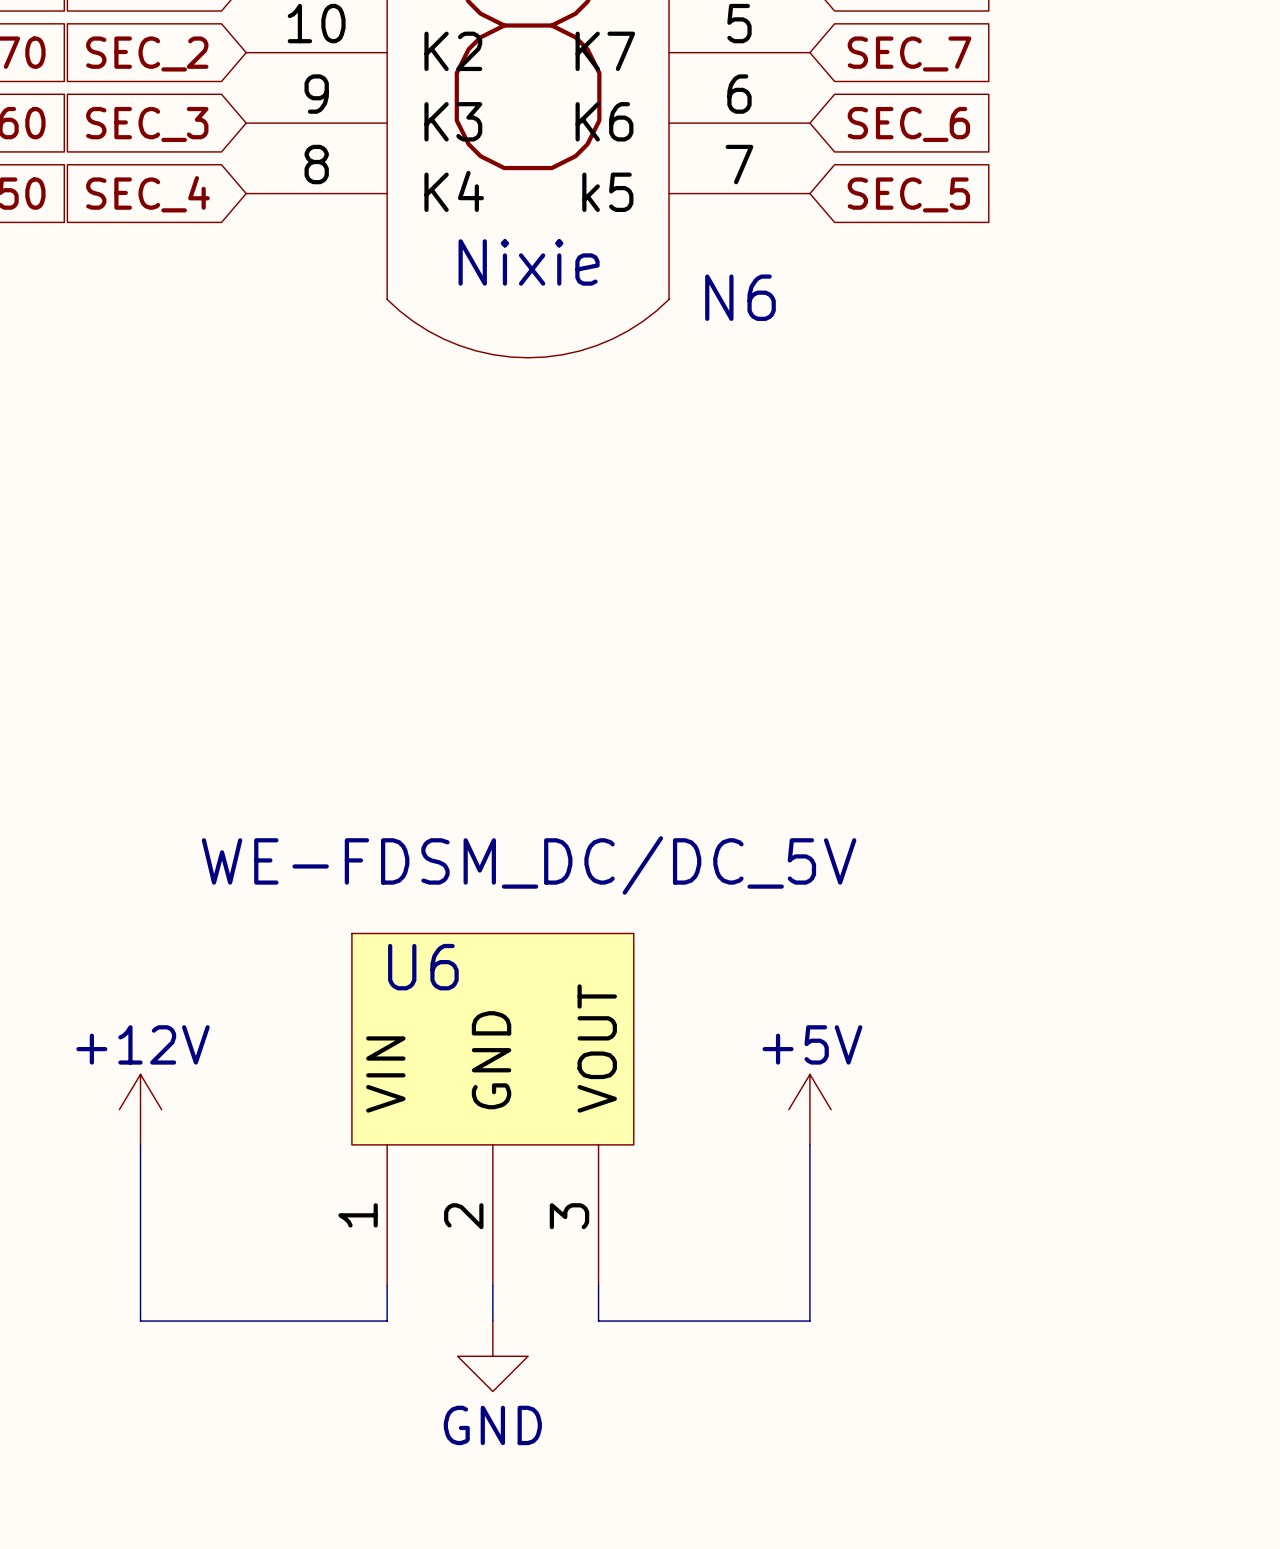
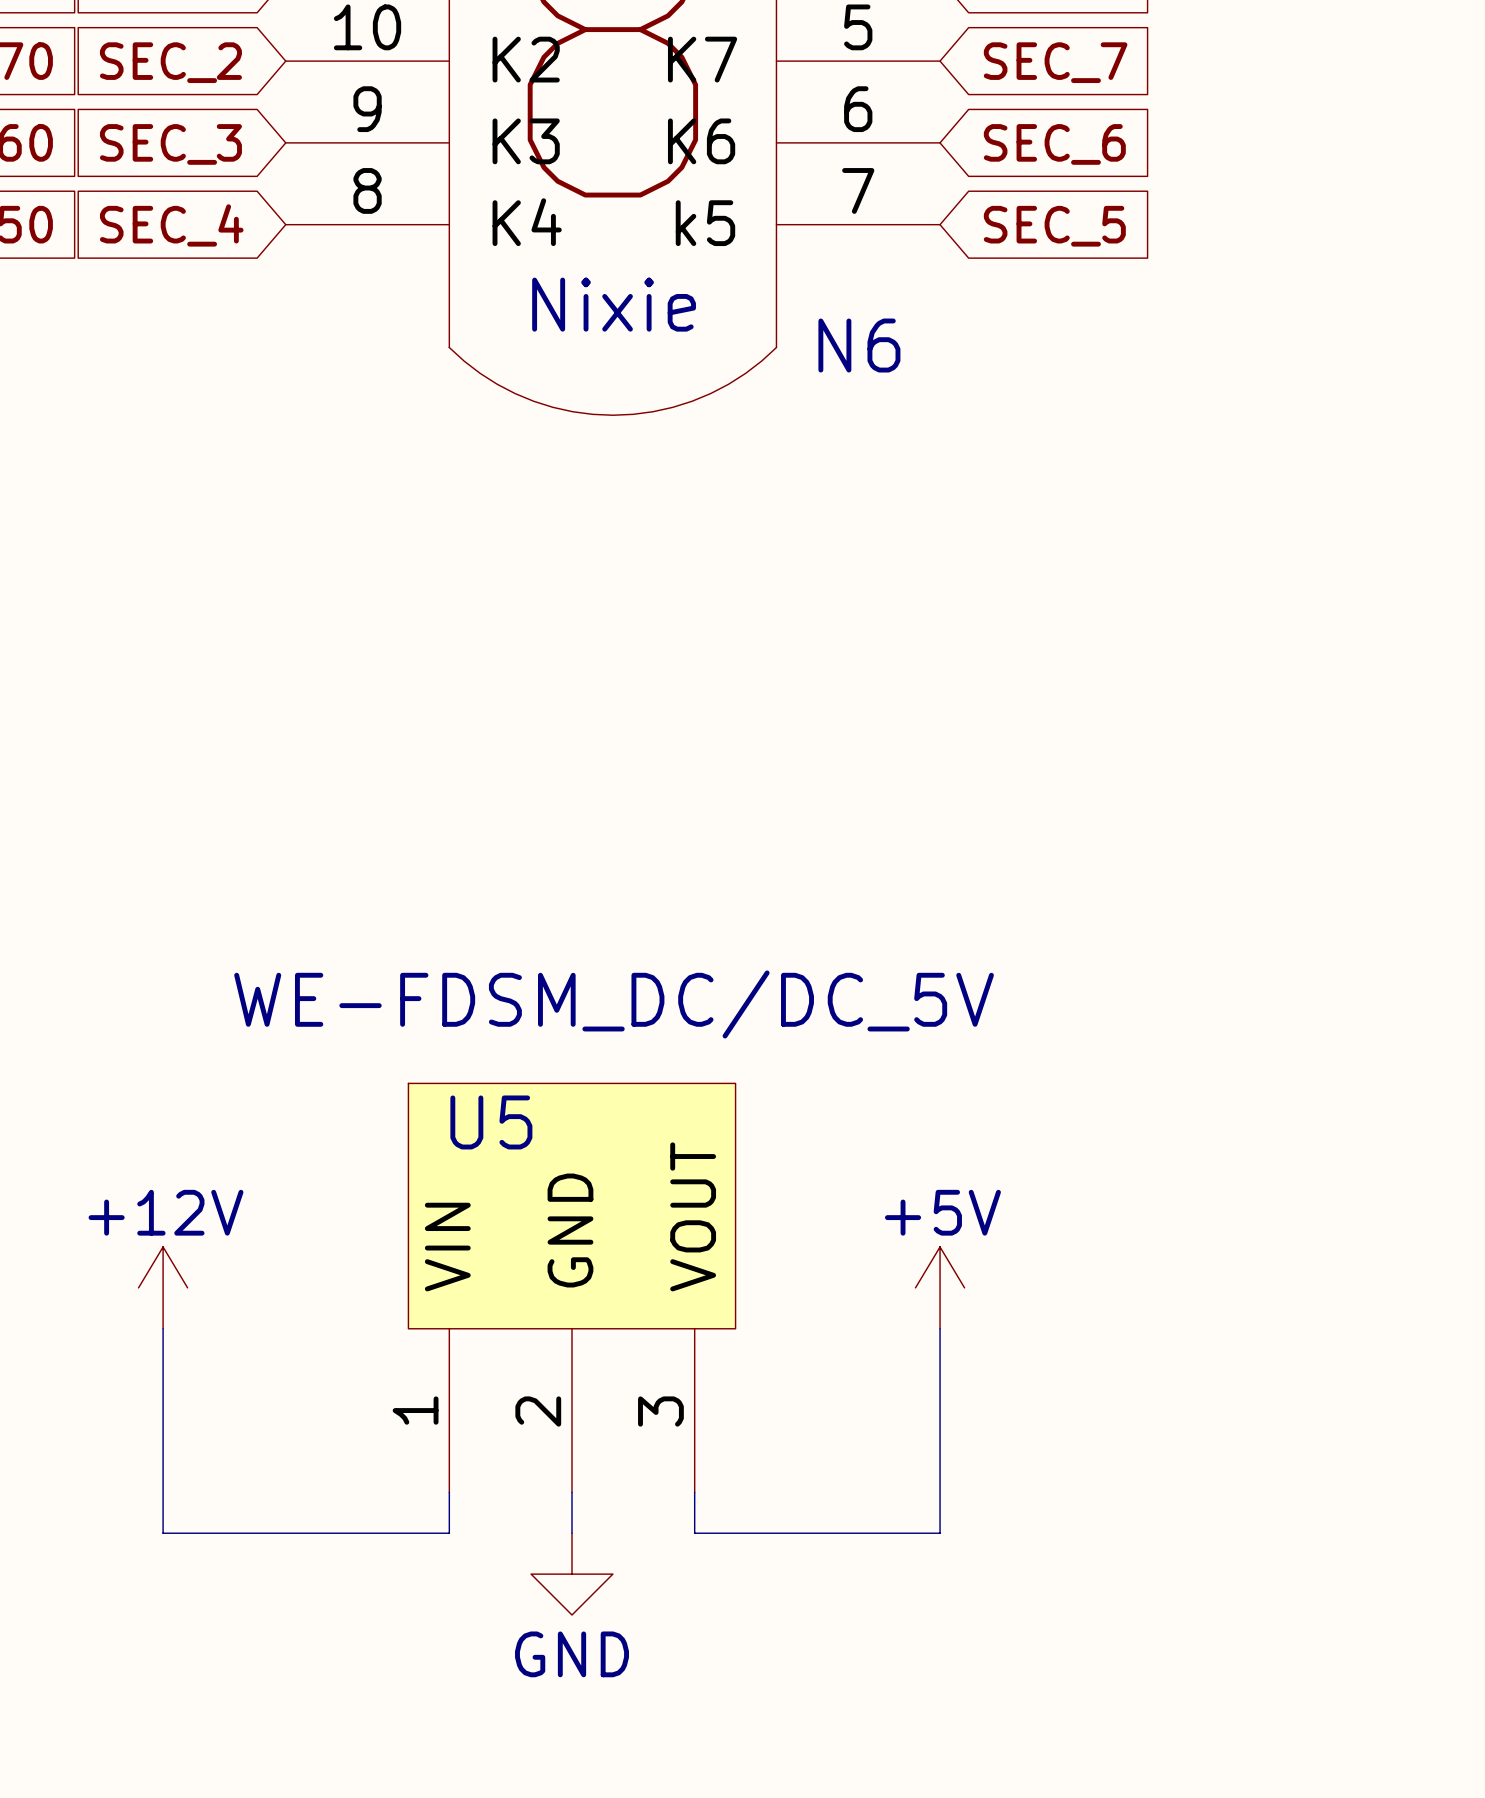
U6 name: U6 (423, 967) -> U5 (491, 1122)

